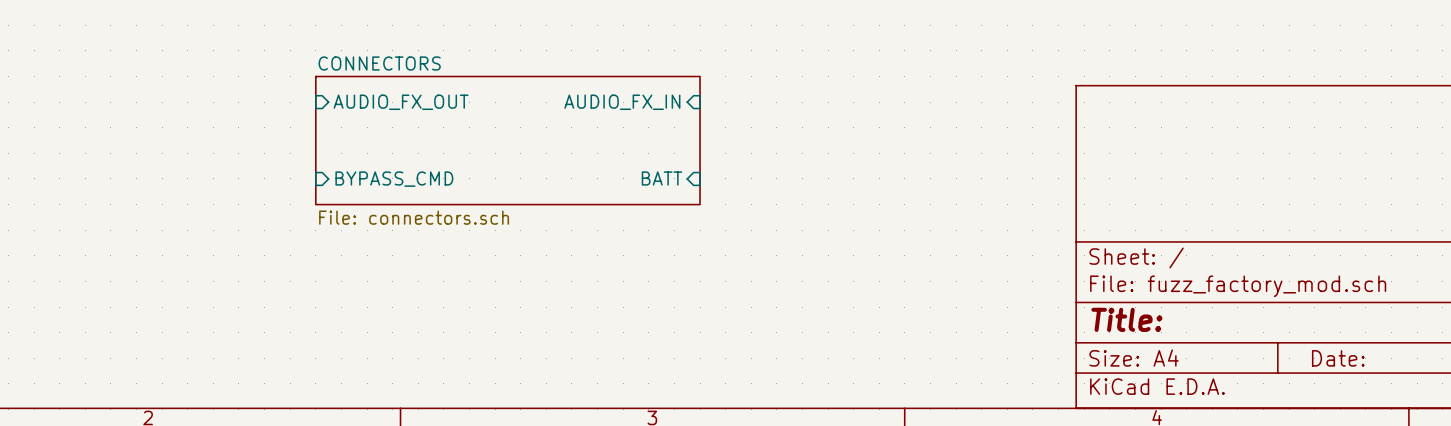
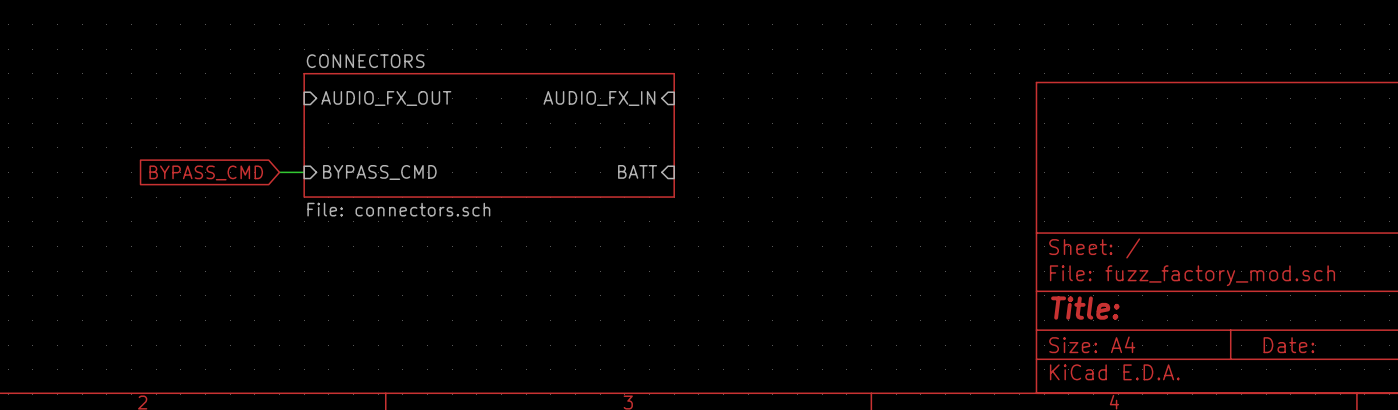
wire: none -> (279, 172) (304, 172)
global label: none -> BYPASS_CMD (206, 172)

